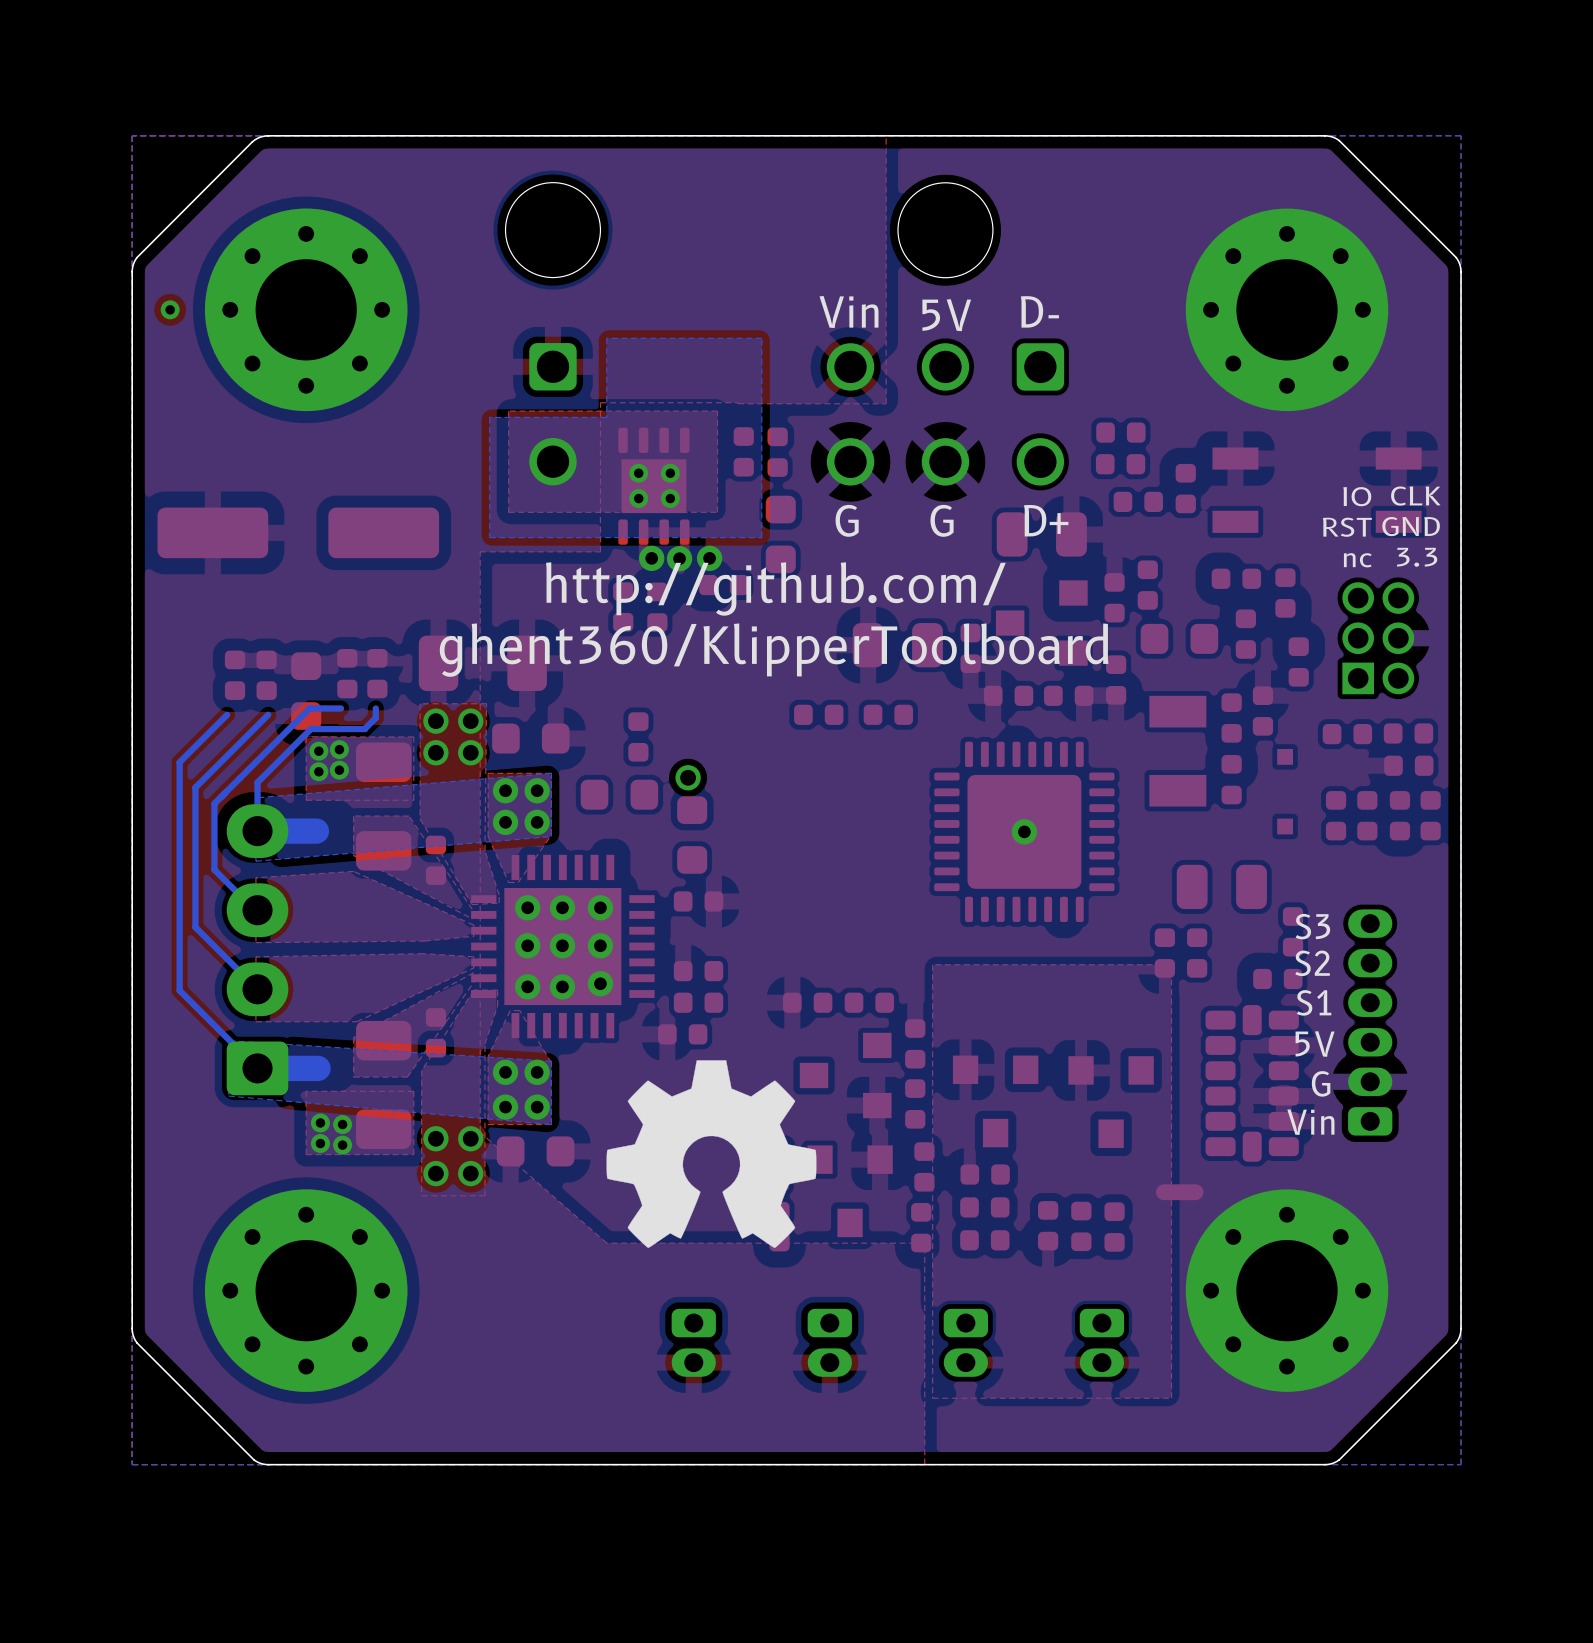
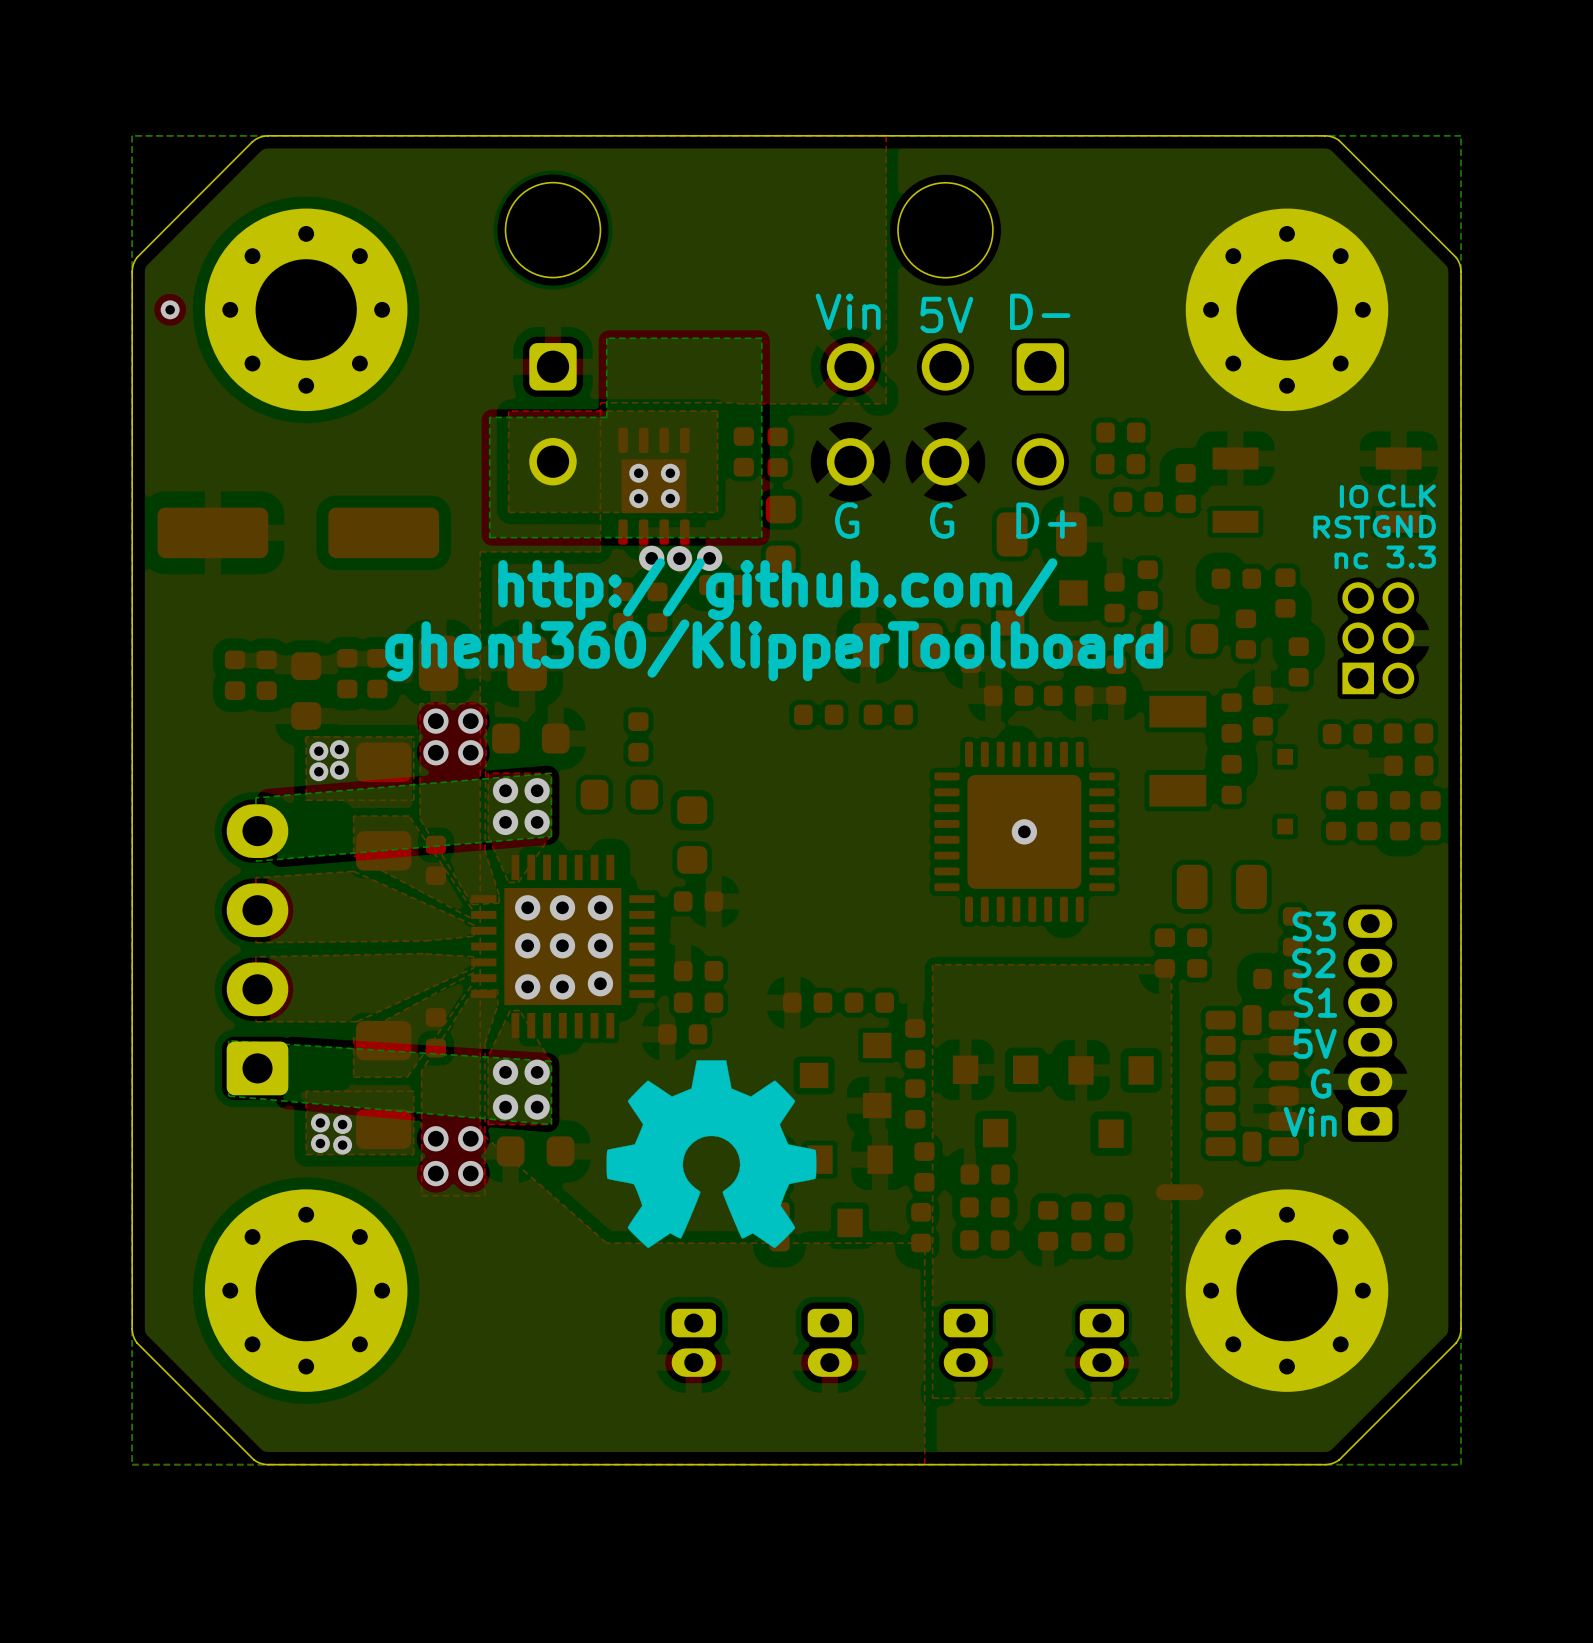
bottom track: (341, 708) (309, 708) (214, 803) (214, 869) (254, 910) -> none
bottom track: (375, 708) (375, 717) (364, 729) (310, 729) (257, 782) (257, 831) (316, 831) -> none
bottom track: (227, 714) (179, 762) (179, 990) (257, 1068) (318, 1068) -> none
bottom track: (268, 714) (195, 787) (195, 927) (257, 989) (253, 989) -> none
via: (688, 777) -> none

